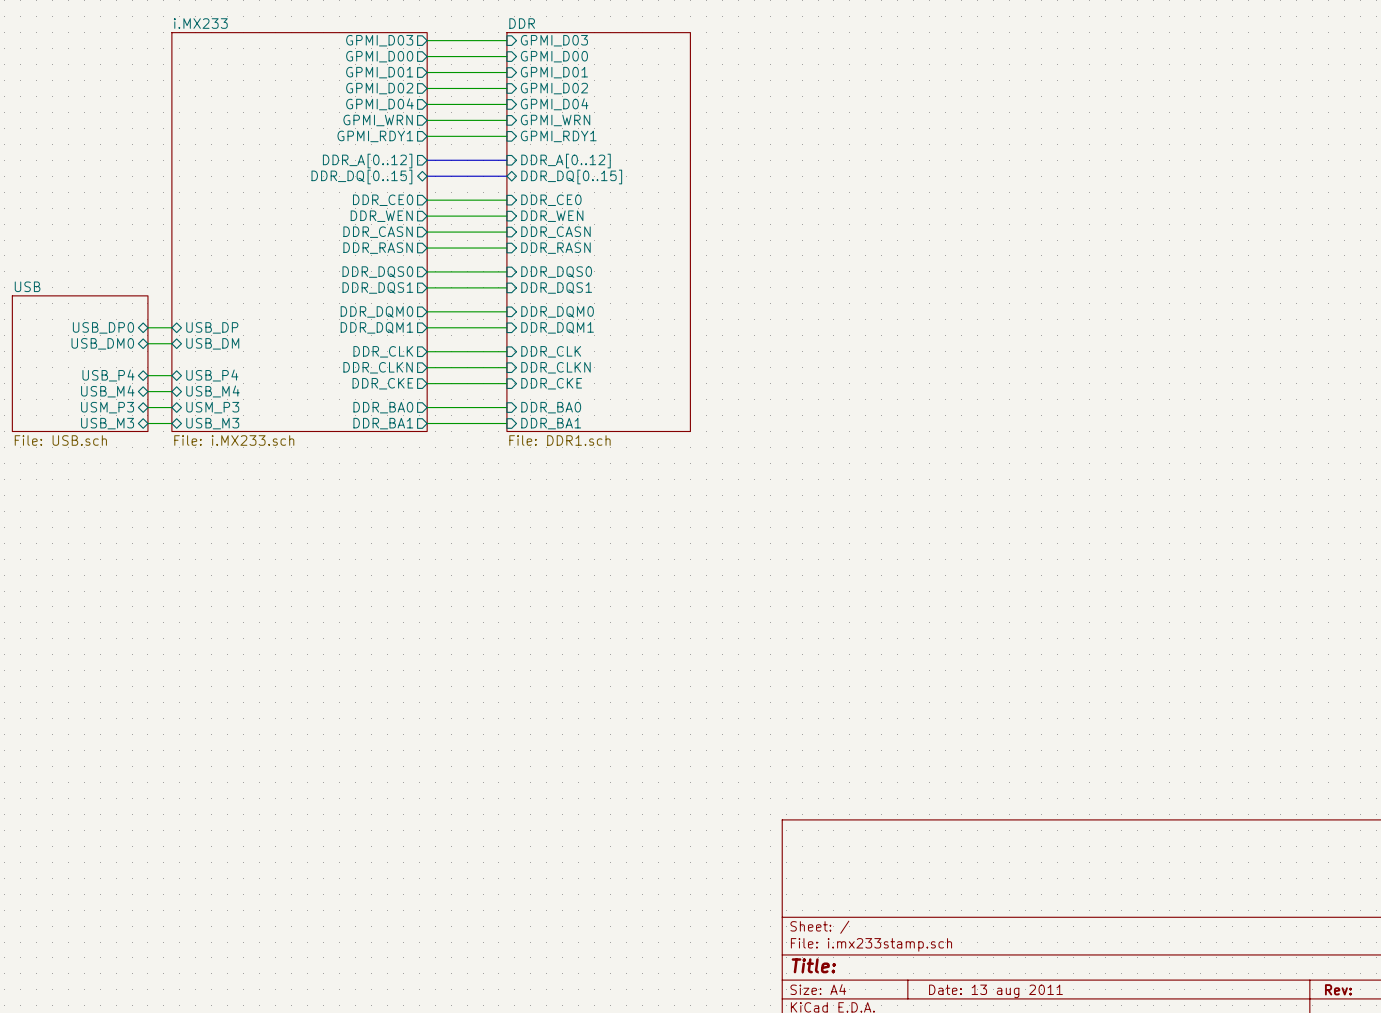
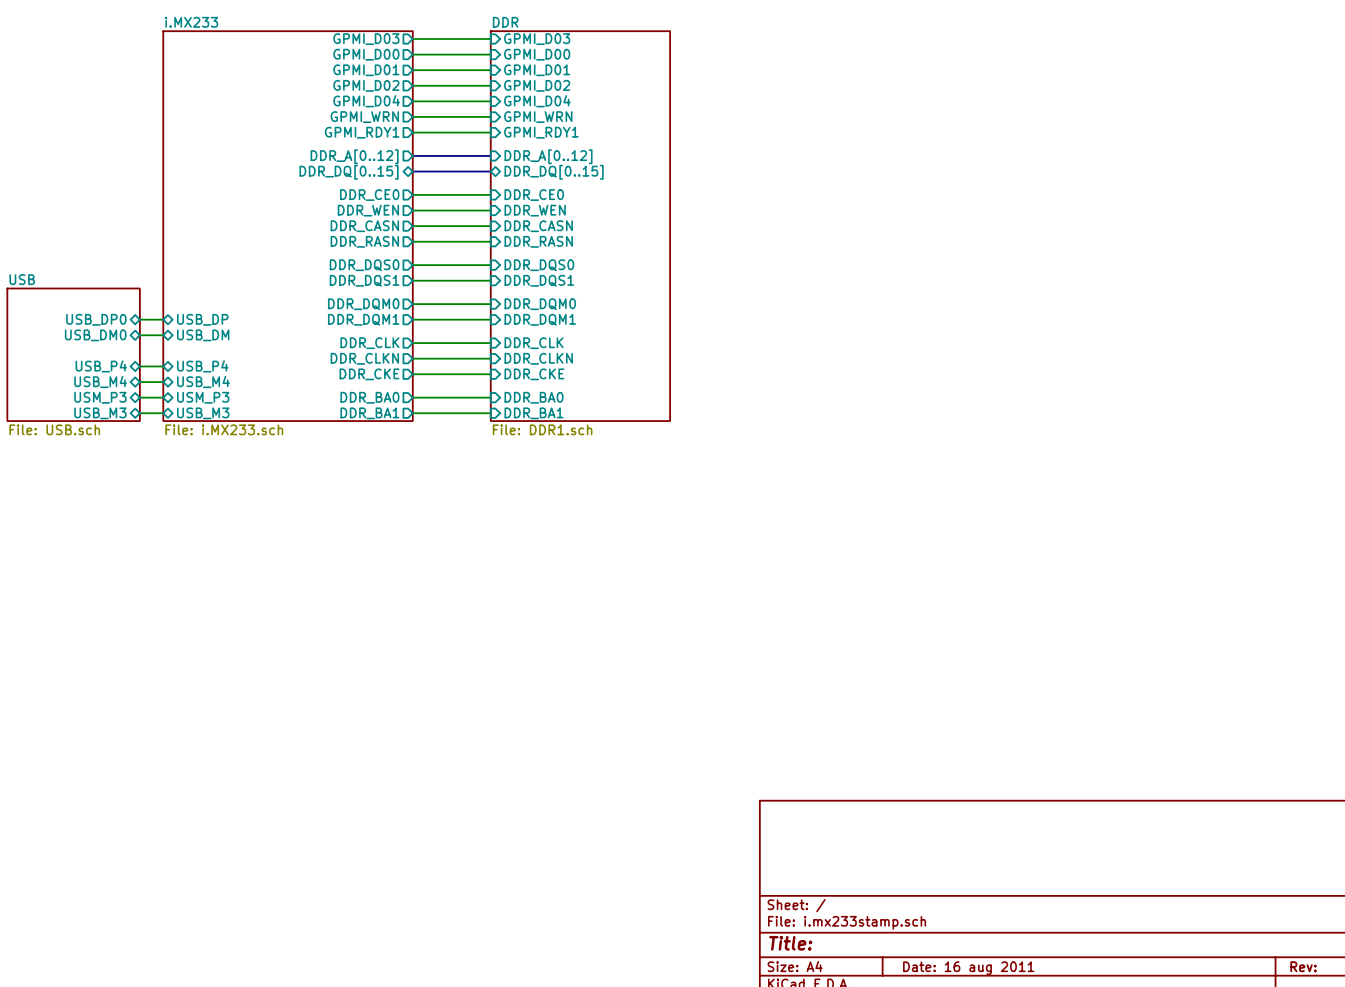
title block: Date: 13 aug 2011 (995, 991) -> Date: 16 aug 2011 (968, 968)

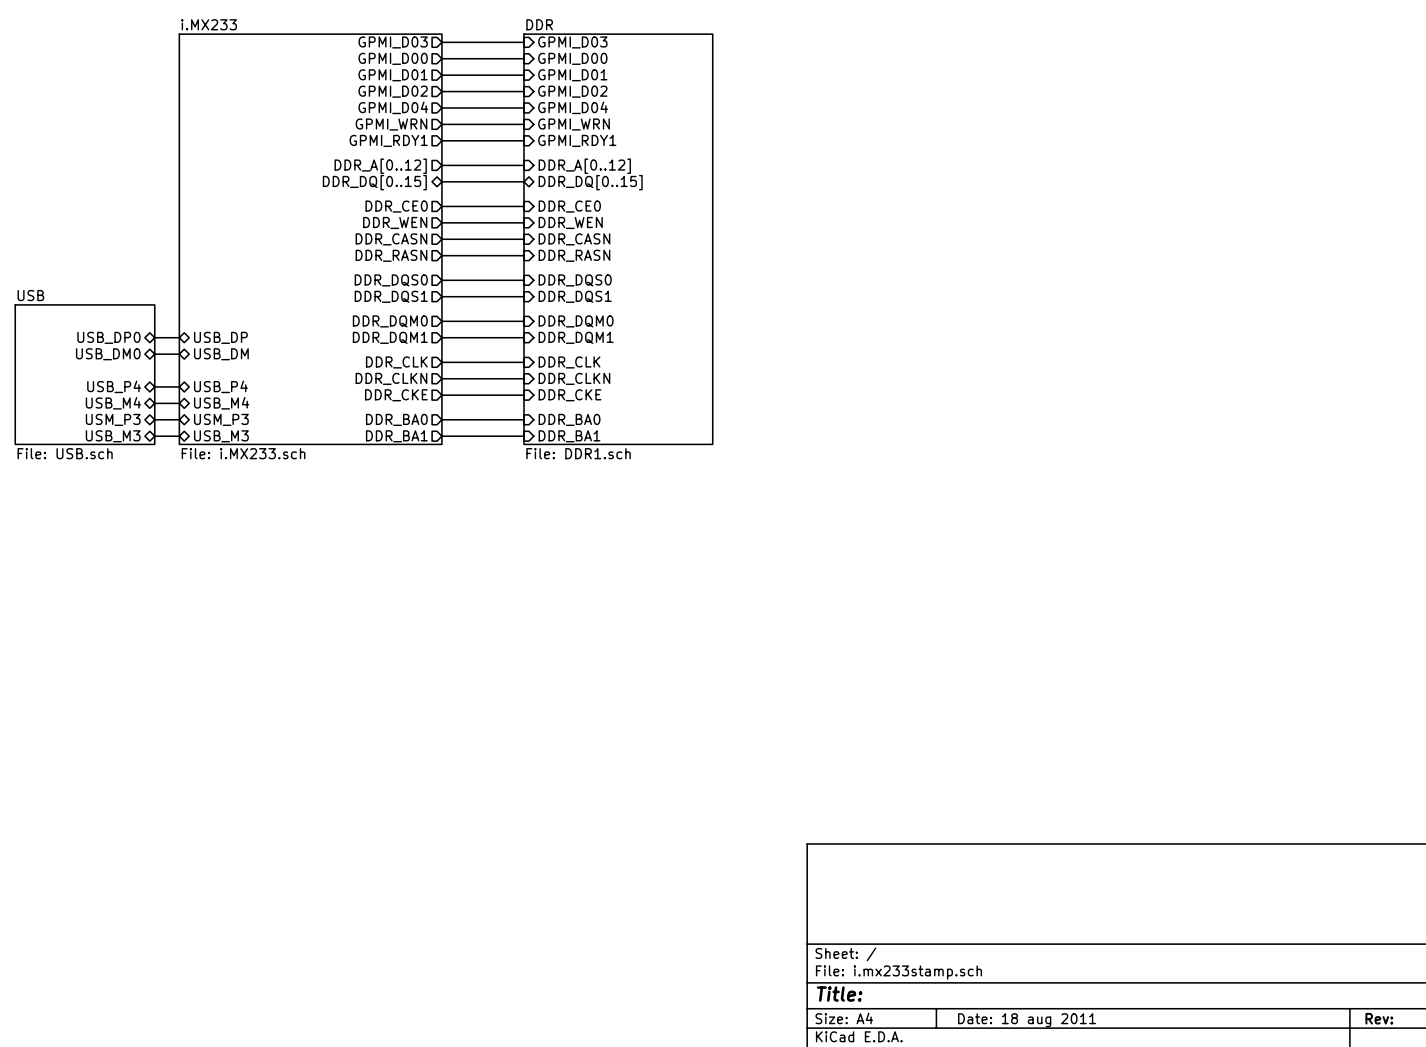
title block: Date: 16 aug 2011 (968, 968) -> Date: 18 aug 2011 (1027, 1020)

